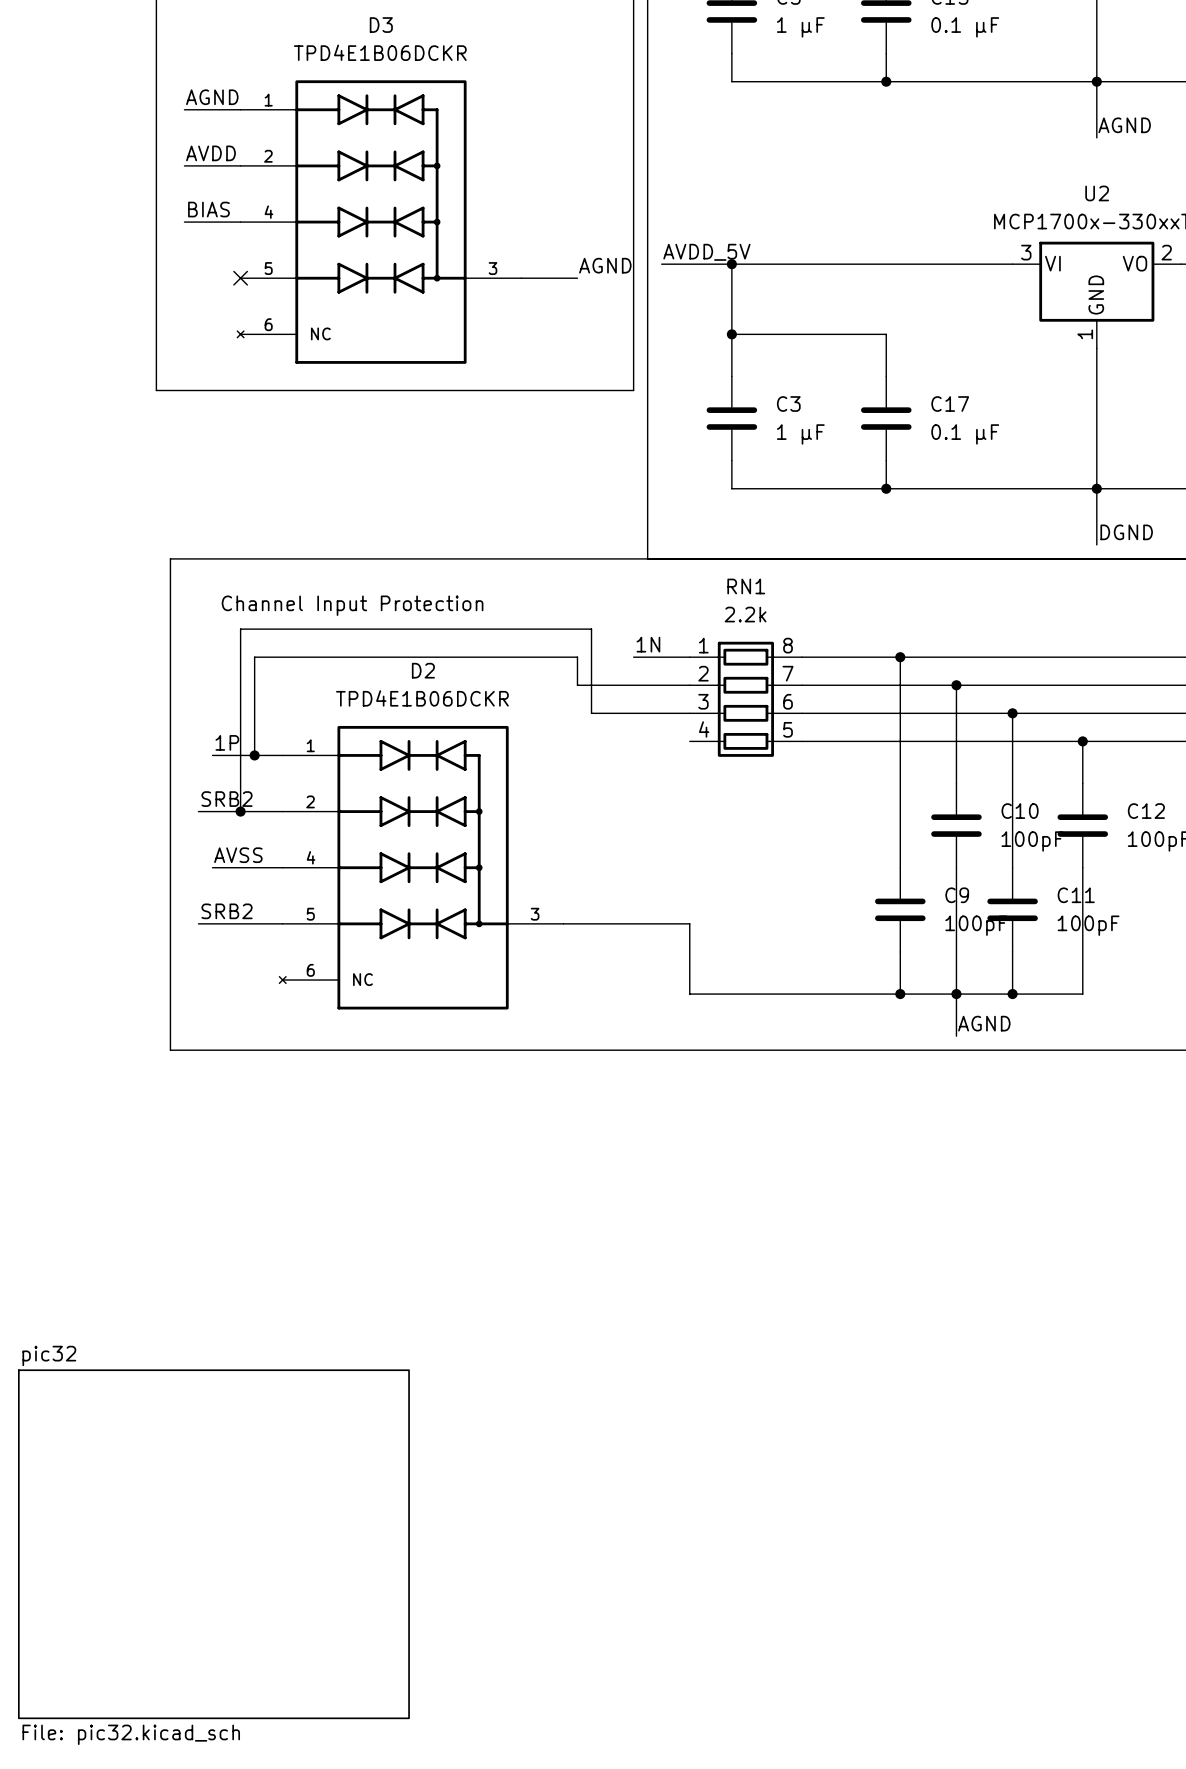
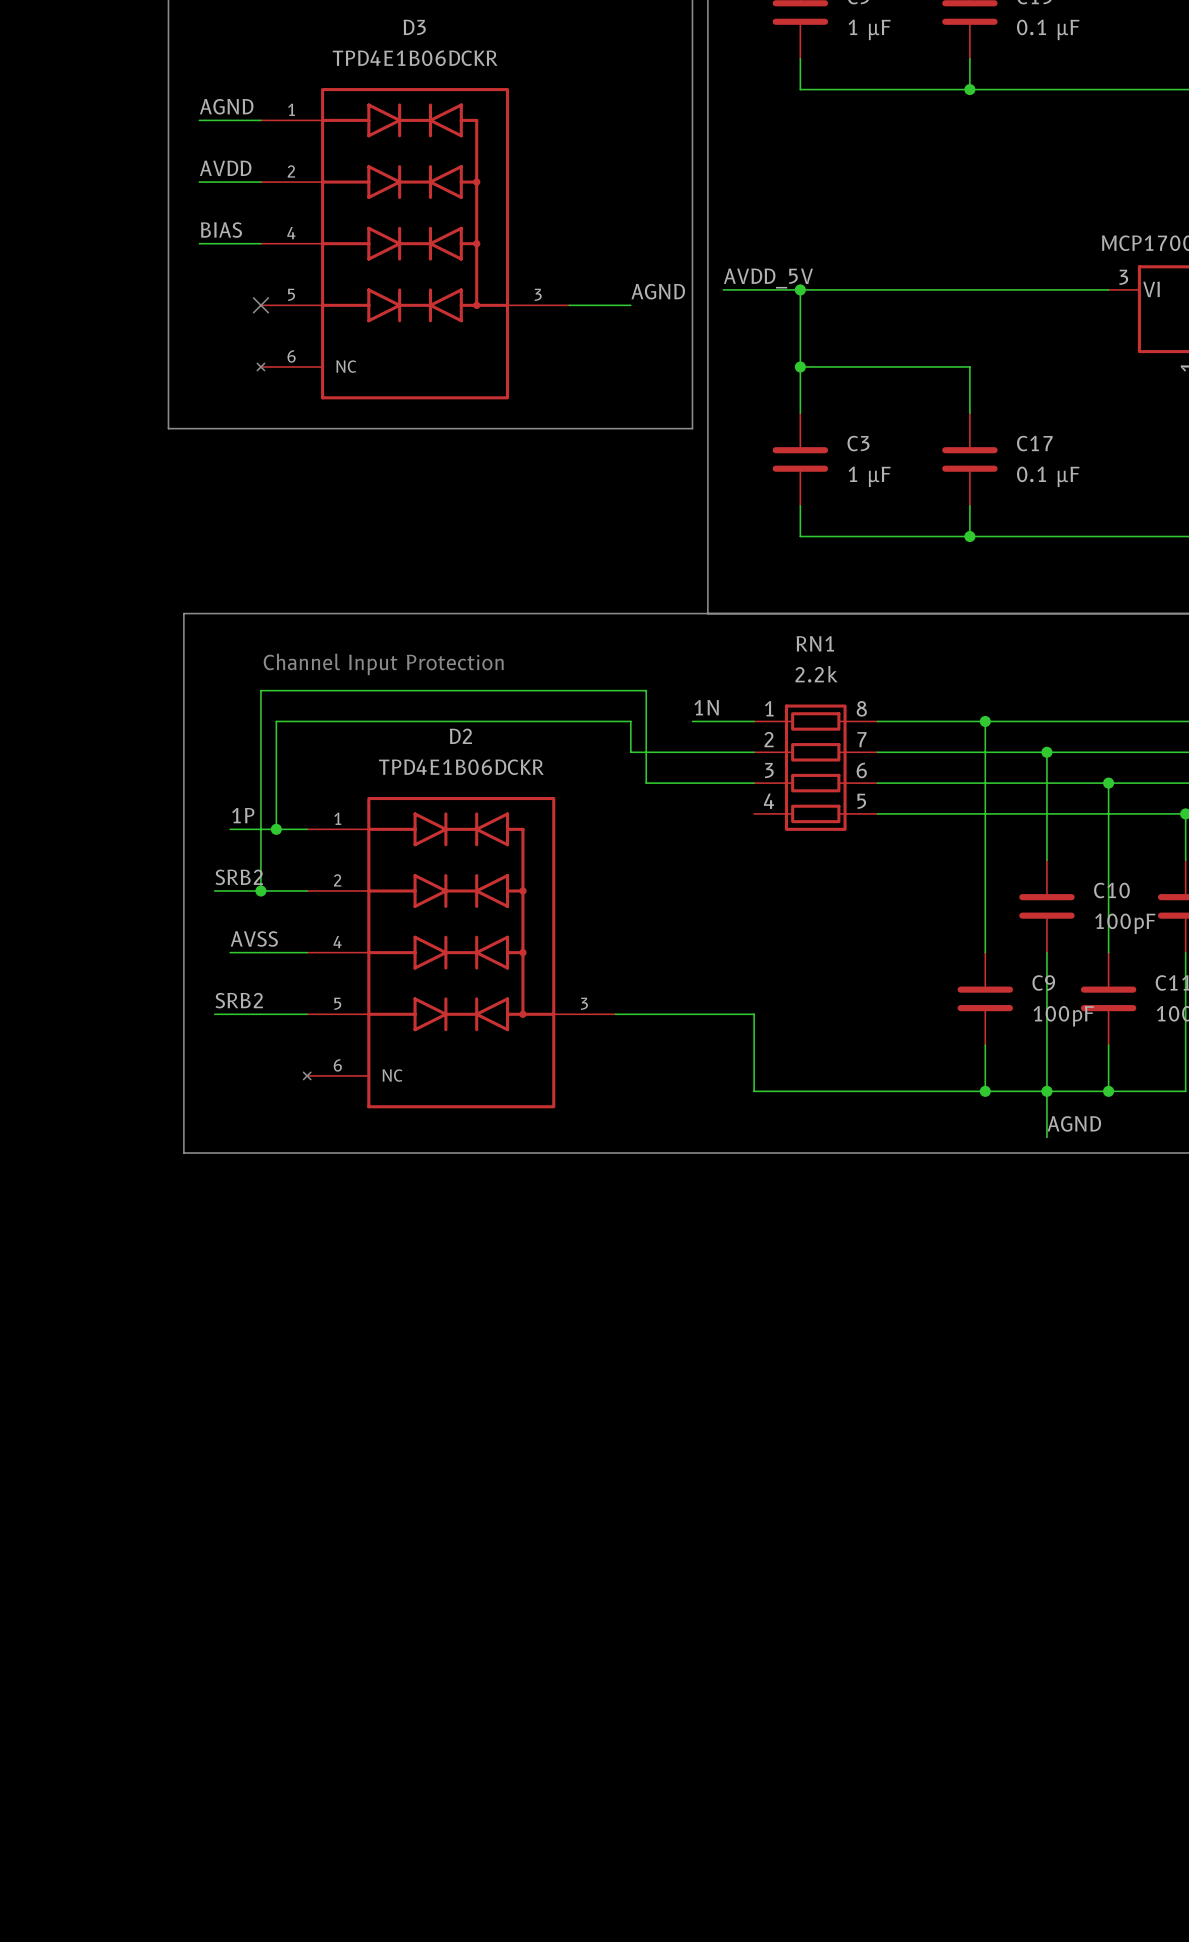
sheet pic32: File: pic32.kicad_sch (213, 1544) -> none

